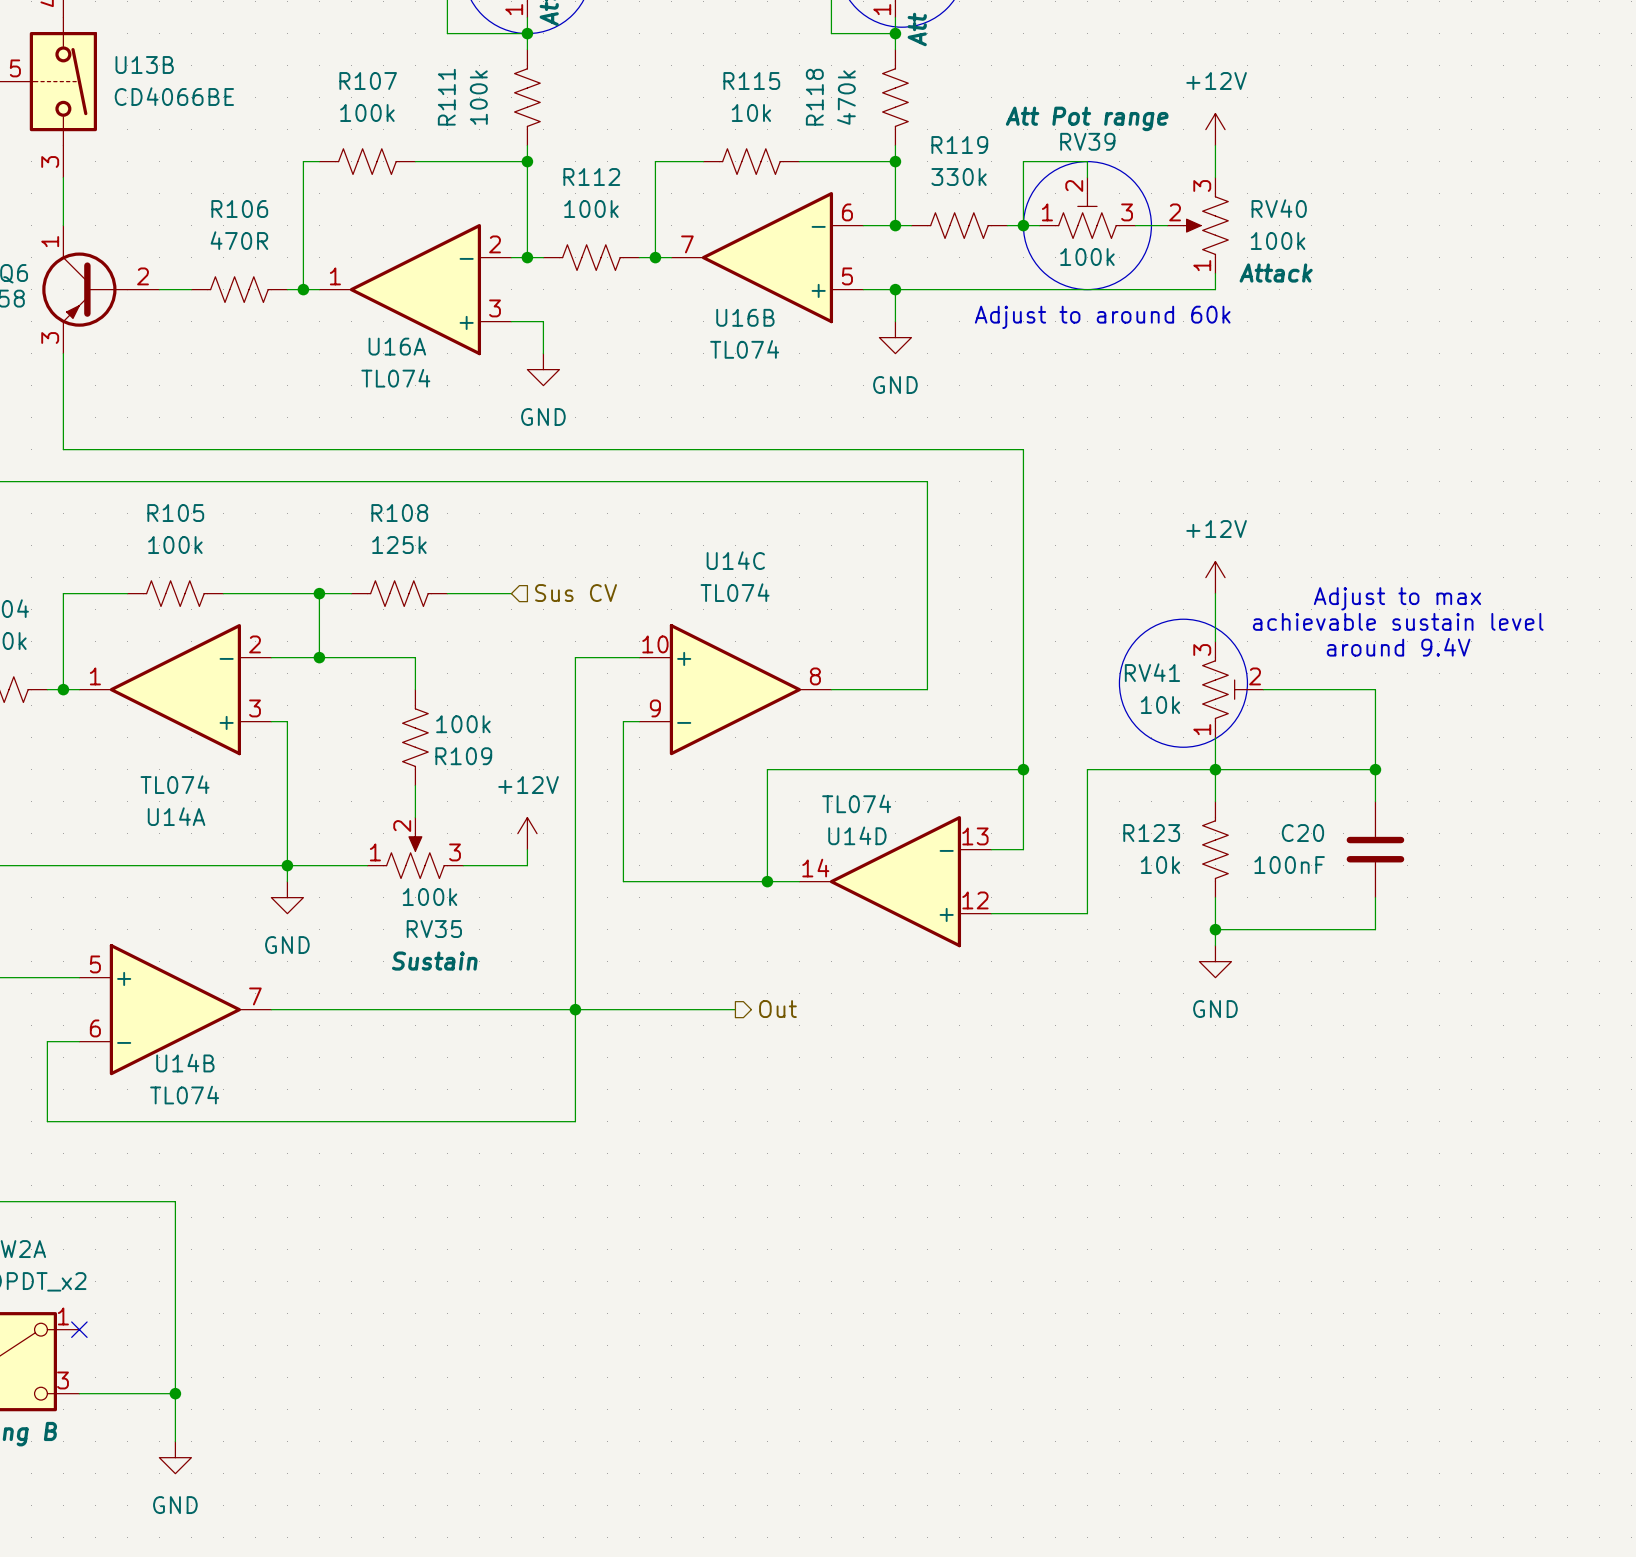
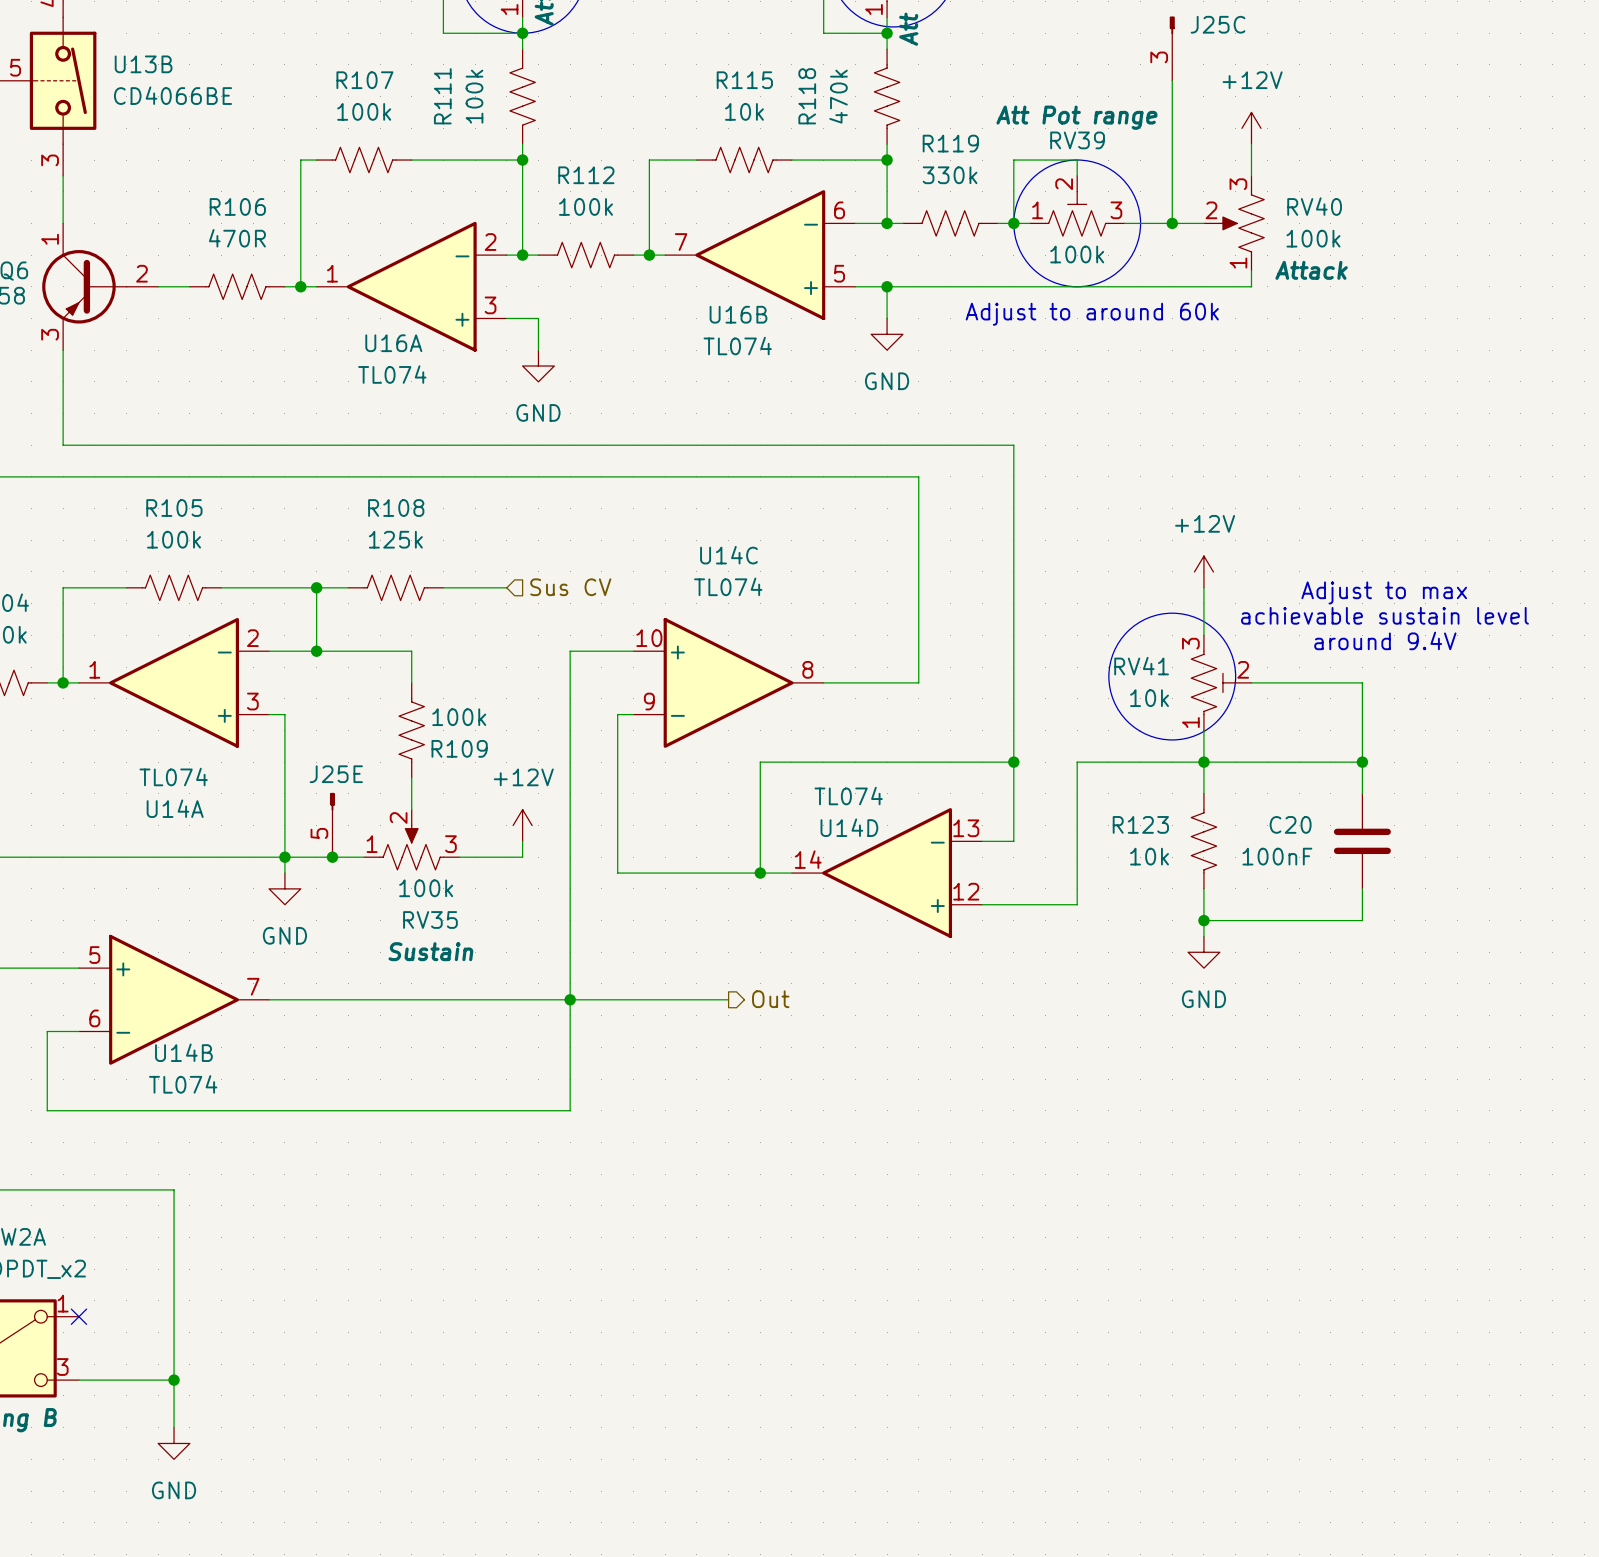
J25C: none -> (1172, 48)
wire: none -> (1172, 80) (1172, 223)
power symbol position: +12V (1215, 129) -> +12V (1251, 128)
wire: (1215, 145) (1215, 177) -> (1251, 144) (1251, 175)
junction: none -> (1172, 223)
RV40 position: (1197, 225) -> (1234, 223)
wire: (1215, 273) (1215, 289) -> (1251, 270) (1251, 286) (1203, 286)
J25E: none -> (332, 825)
junction: none -> (332, 857)

